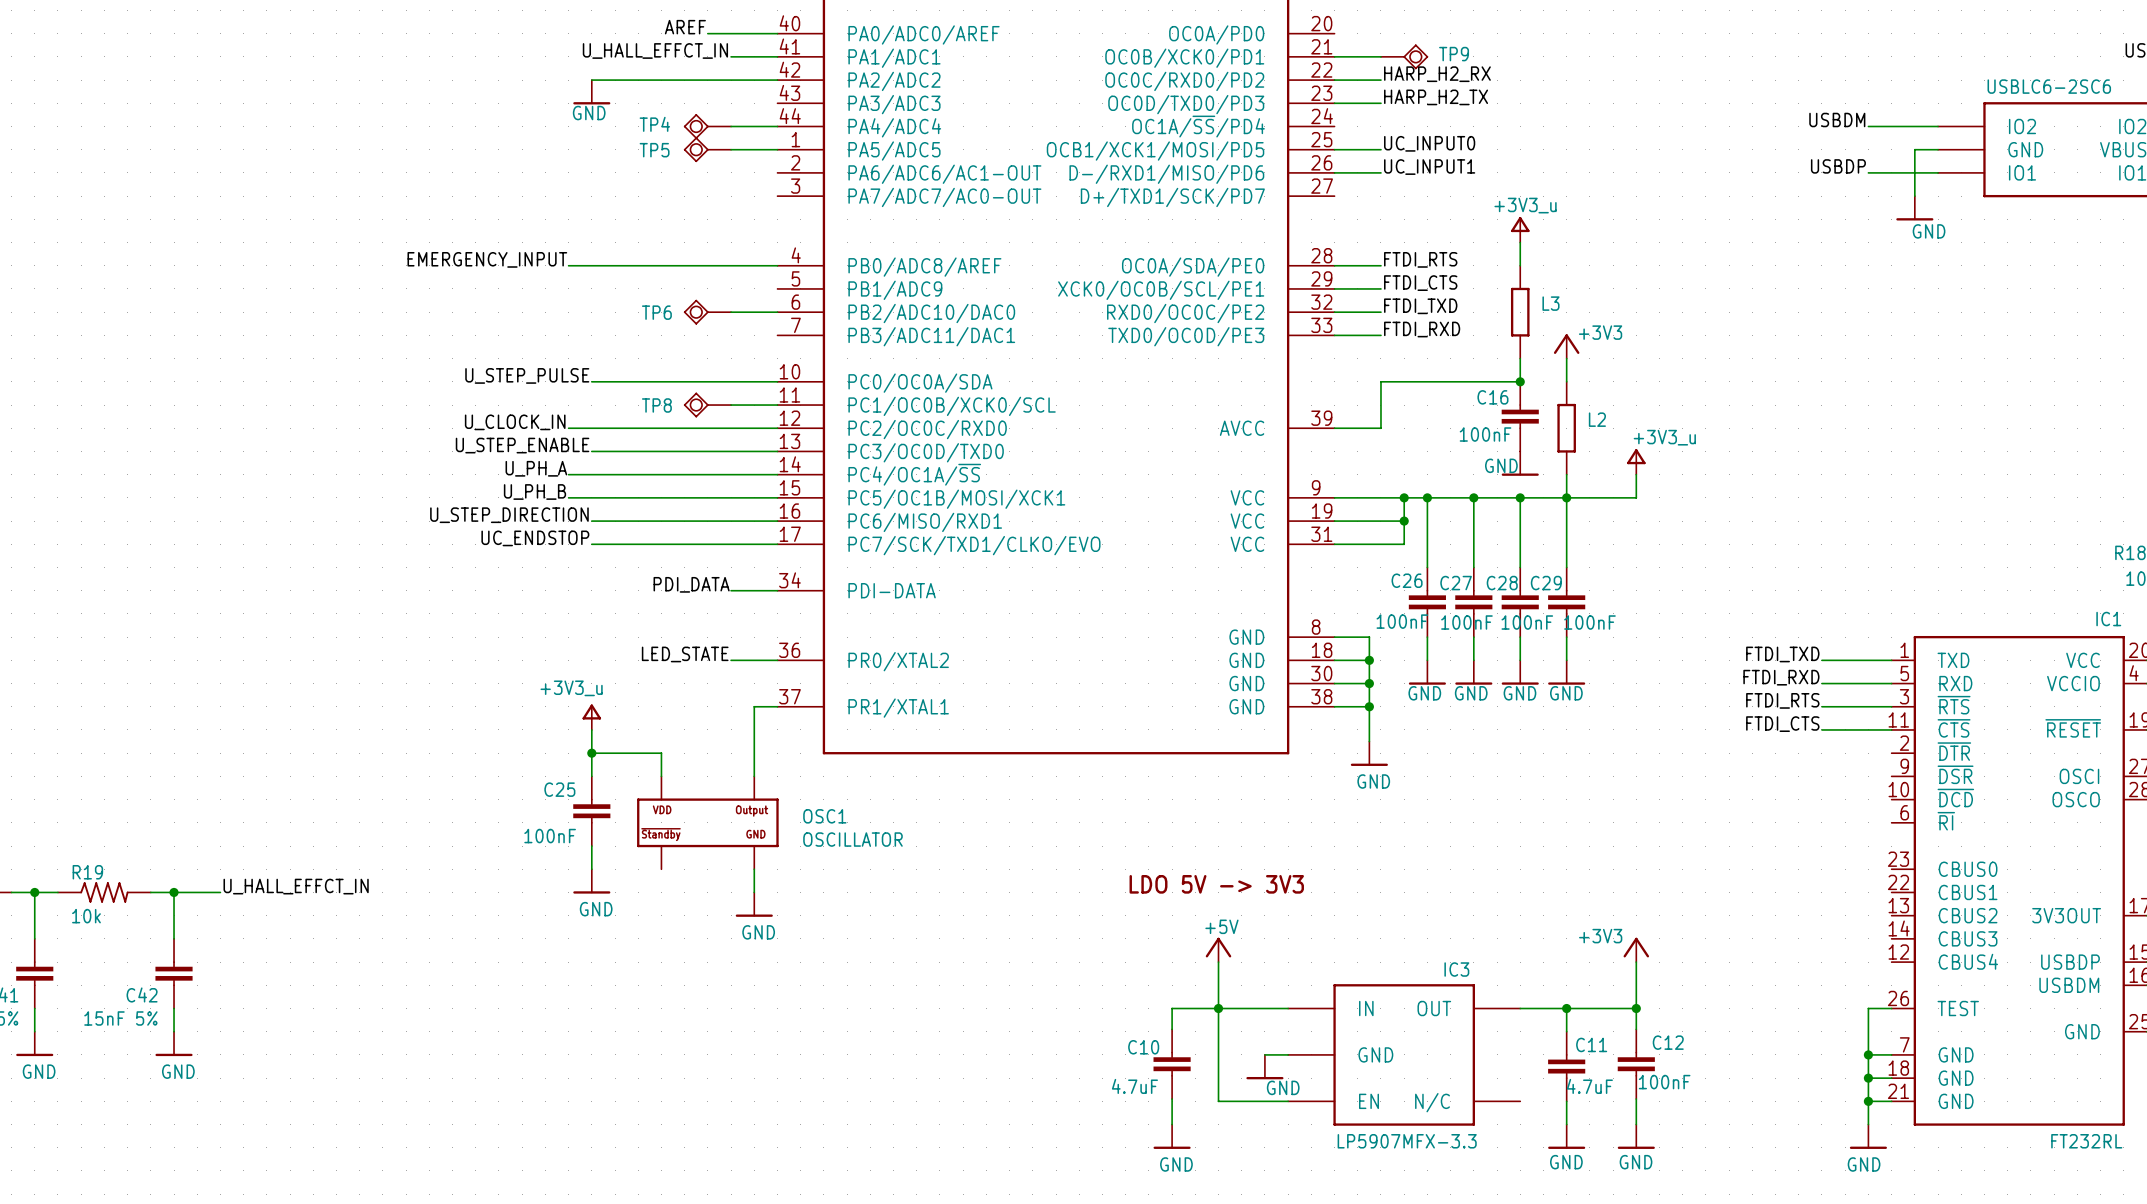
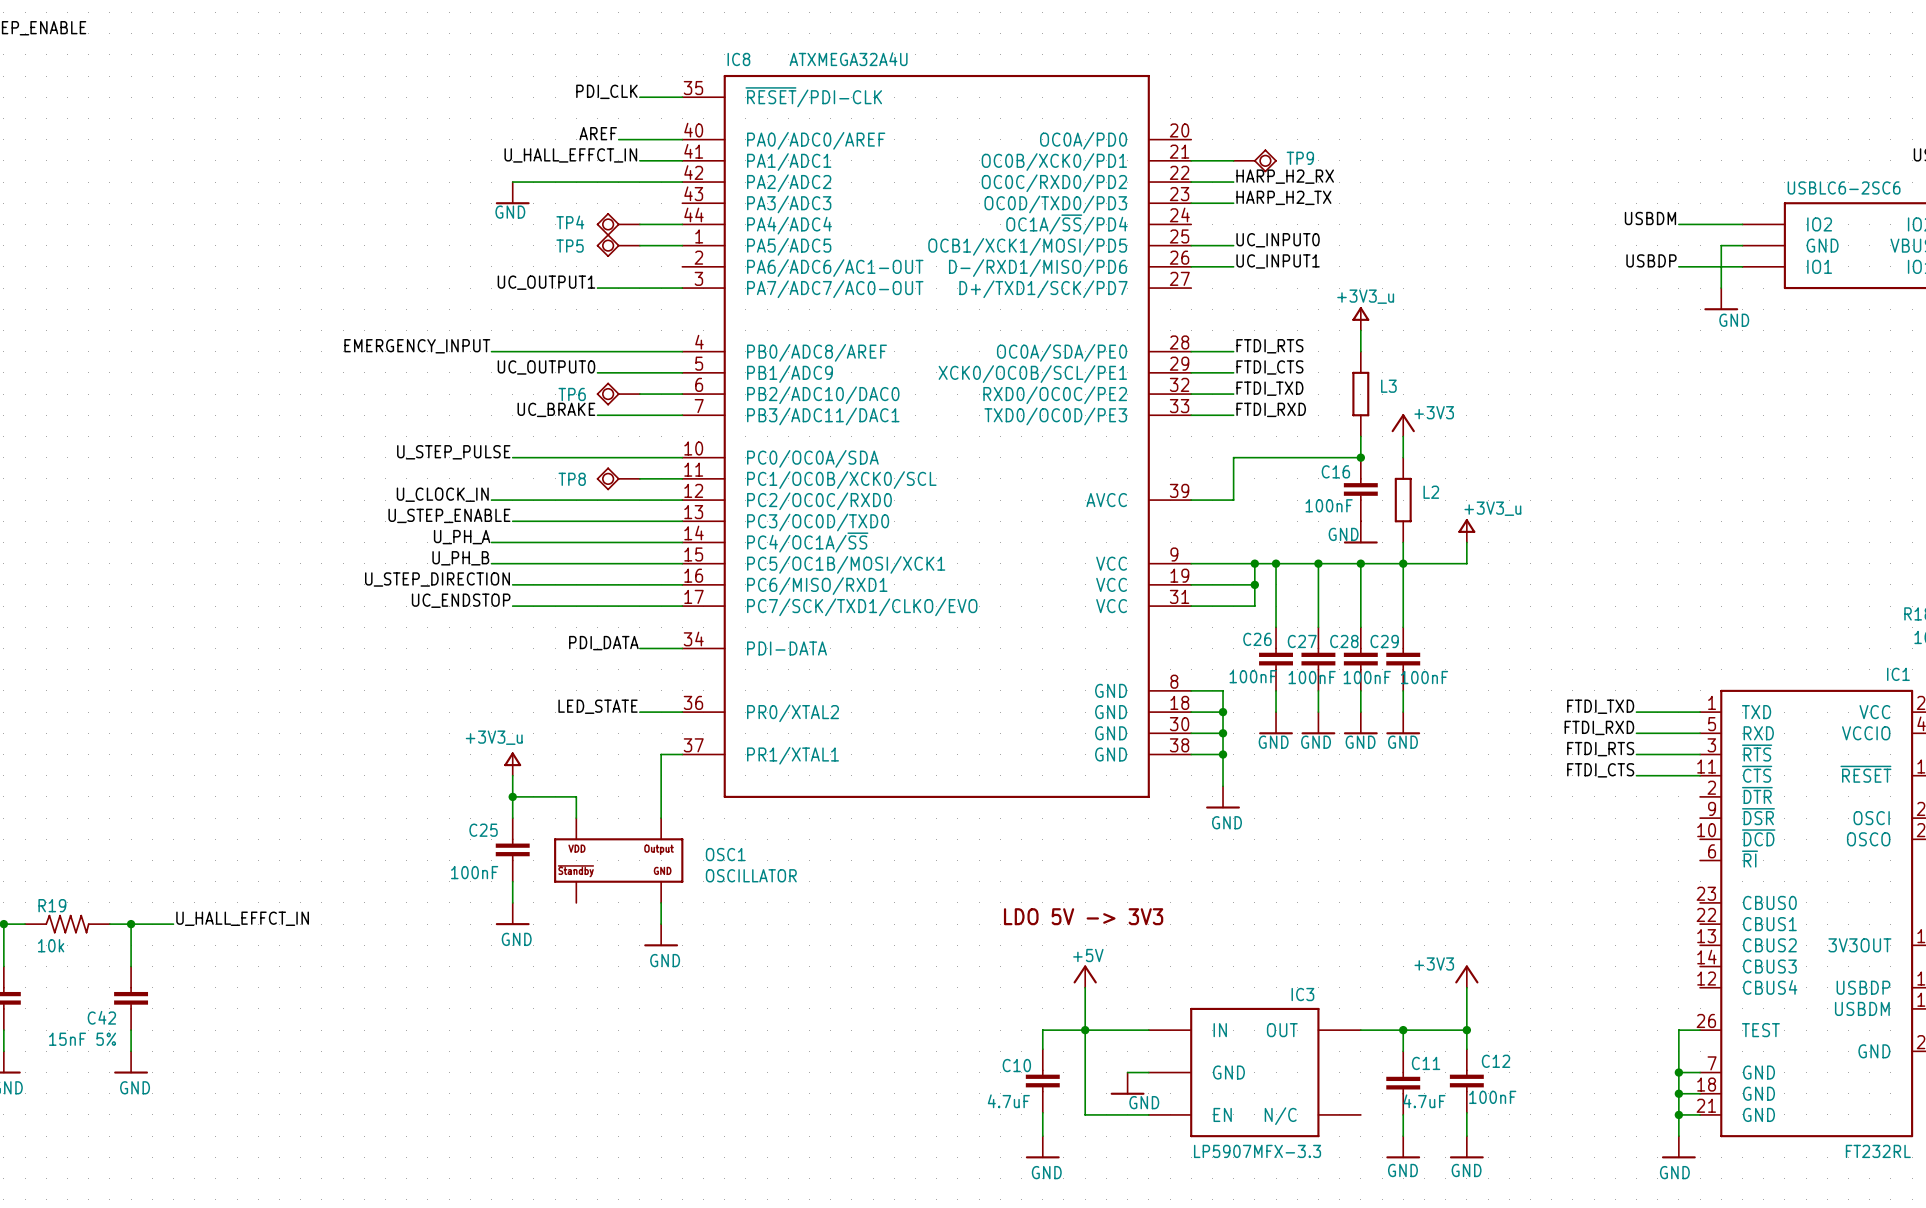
label: none -> UC_OUTPUT1 (546, 282)
wire: none -> (597, 288) (682, 288)
label: none -> UC_OUTPUT0 (546, 367)
wire: none -> (597, 372) (682, 372)
label: none -> UC_BRAKE (556, 409)
wire: none -> (597, 415) (682, 415)

